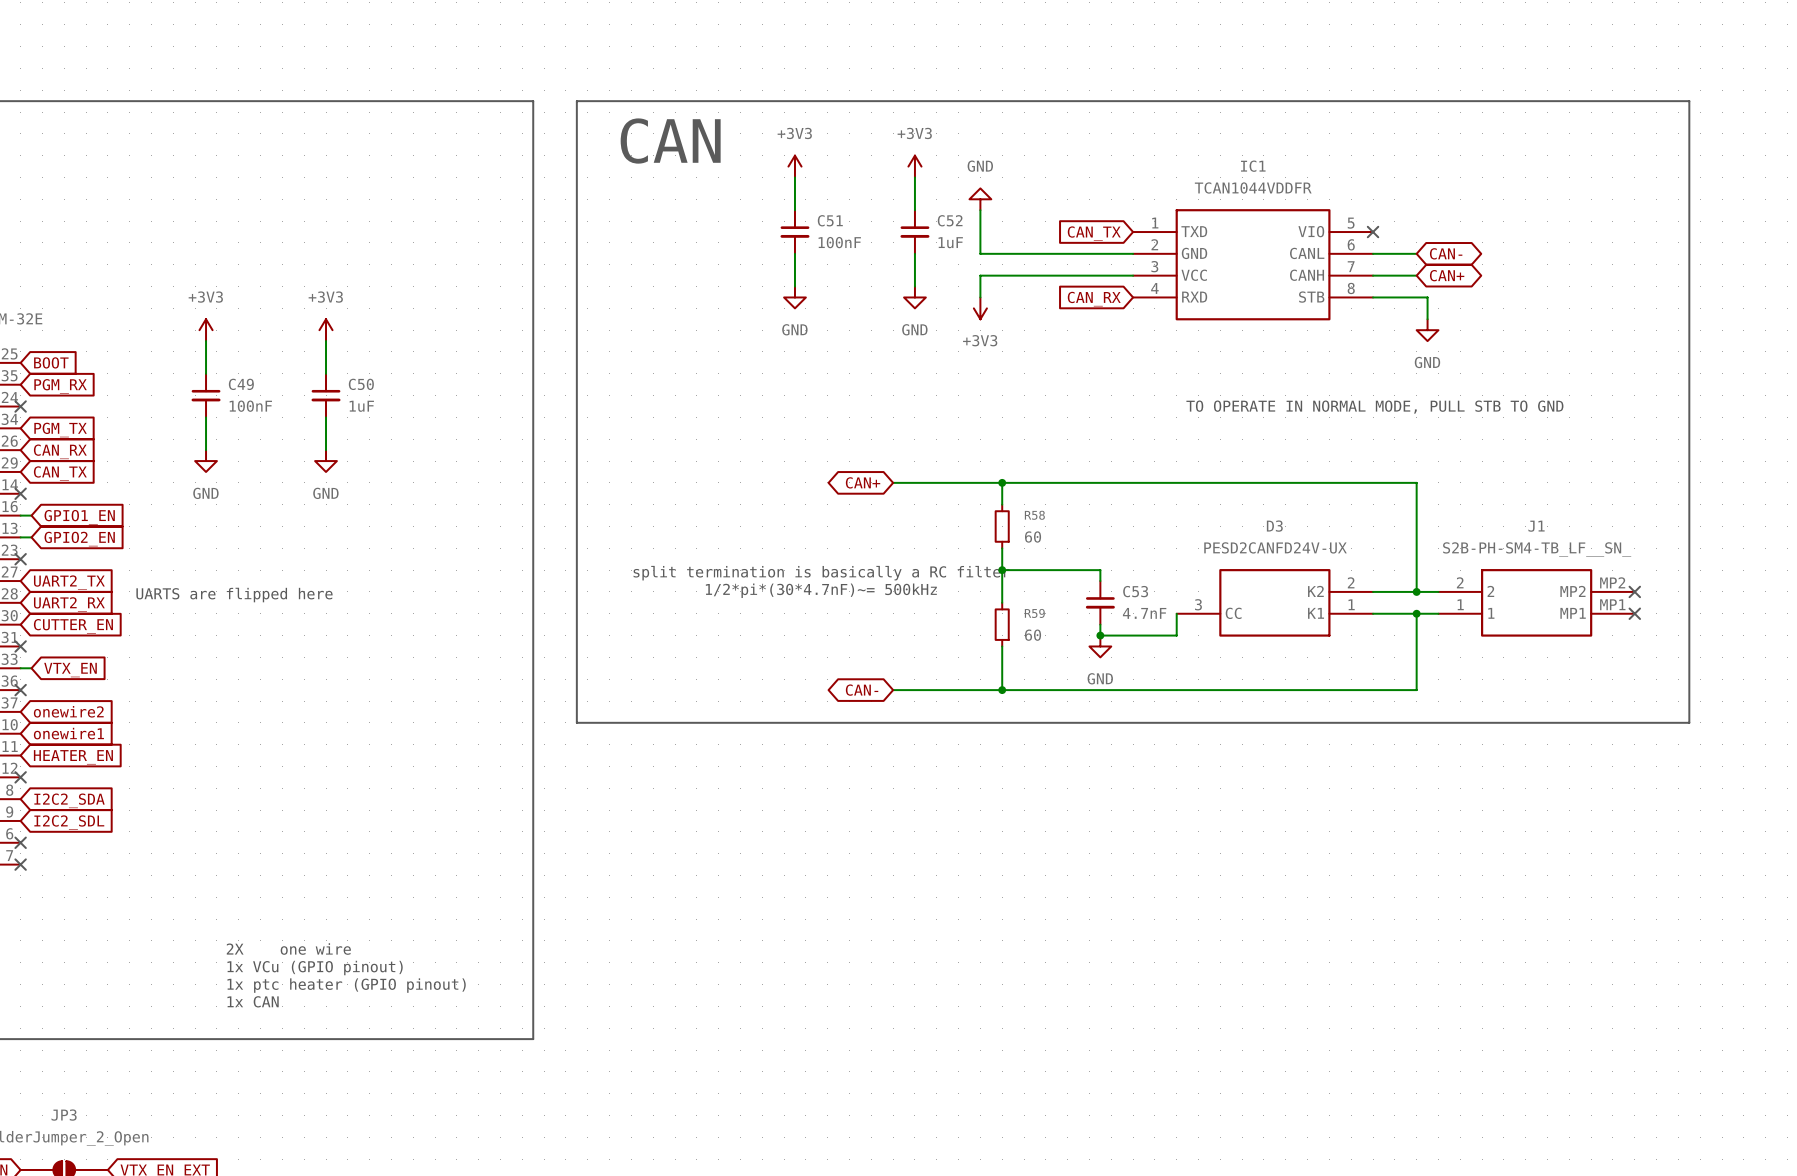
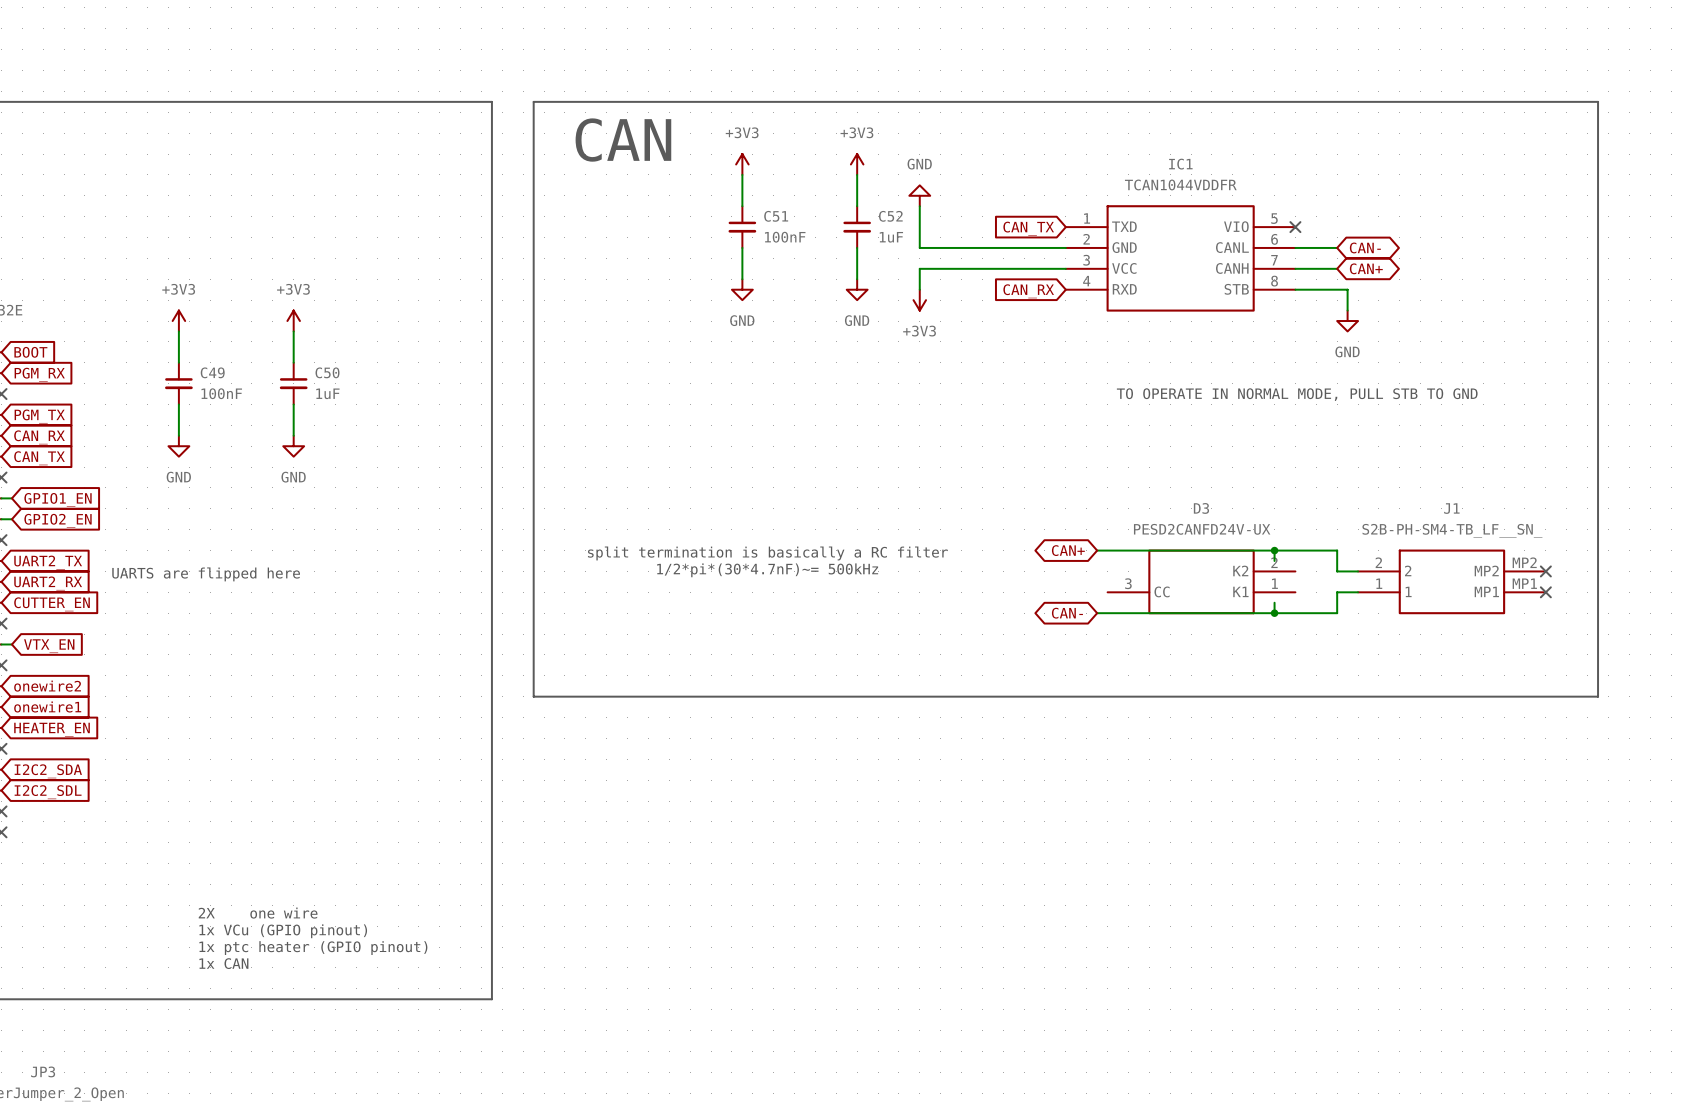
global label: CAN+ (863, 482) -> none
wire: (893, 482) (1416, 482) (1416, 570) -> (1097, 550) (1337, 550)
wire: (1002, 482) (1002, 504) -> none
junction: (1002, 482) -> none
R58: 60 (1002, 526) -> none
wire: (1002, 548) (1002, 602) -> none
wire: (1002, 570) (1100, 570) (1100, 581) -> none
junction: (1002, 570) -> none
global label: none -> CAN+ (1068, 550)
wire: none -> (1274, 550) (1274, 561)
junction: none -> (1274, 550)
wire: (1373, 591) (1416, 591) -> none
junction: (1416, 591) -> none
C53: 4.7nF (1100, 602) -> none
wire: (1176, 613) (1176, 635) -> (1337, 613) (1107, 613)
wire: (1373, 613) (1416, 613) -> none
junction: (1416, 613) -> none
R59: 60 (1002, 624) -> none
wire: (1100, 624) (1100, 635) (1165, 635) -> none
wire: none -> (1274, 602) (1274, 613)
junction: (1100, 635) -> none
global label: none -> CAN- (1067, 613)
junction: none -> (1274, 613)
wire: (1416, 635) (1416, 690) (893, 690) -> none
wire: (1002, 646) (1002, 690) -> none
power symbol: GND (1100, 646) -> none
global label: CAN- (862, 690) -> none
junction: (1002, 690) -> none

